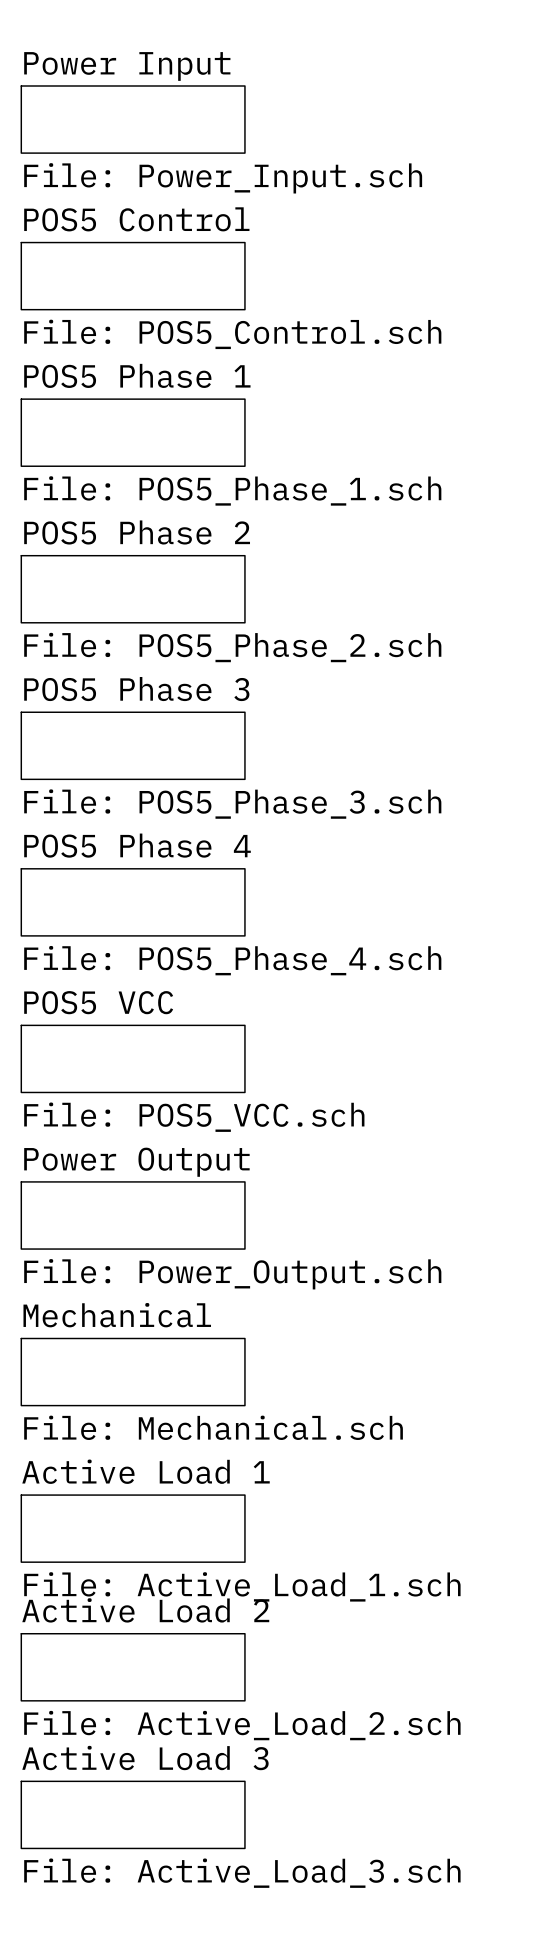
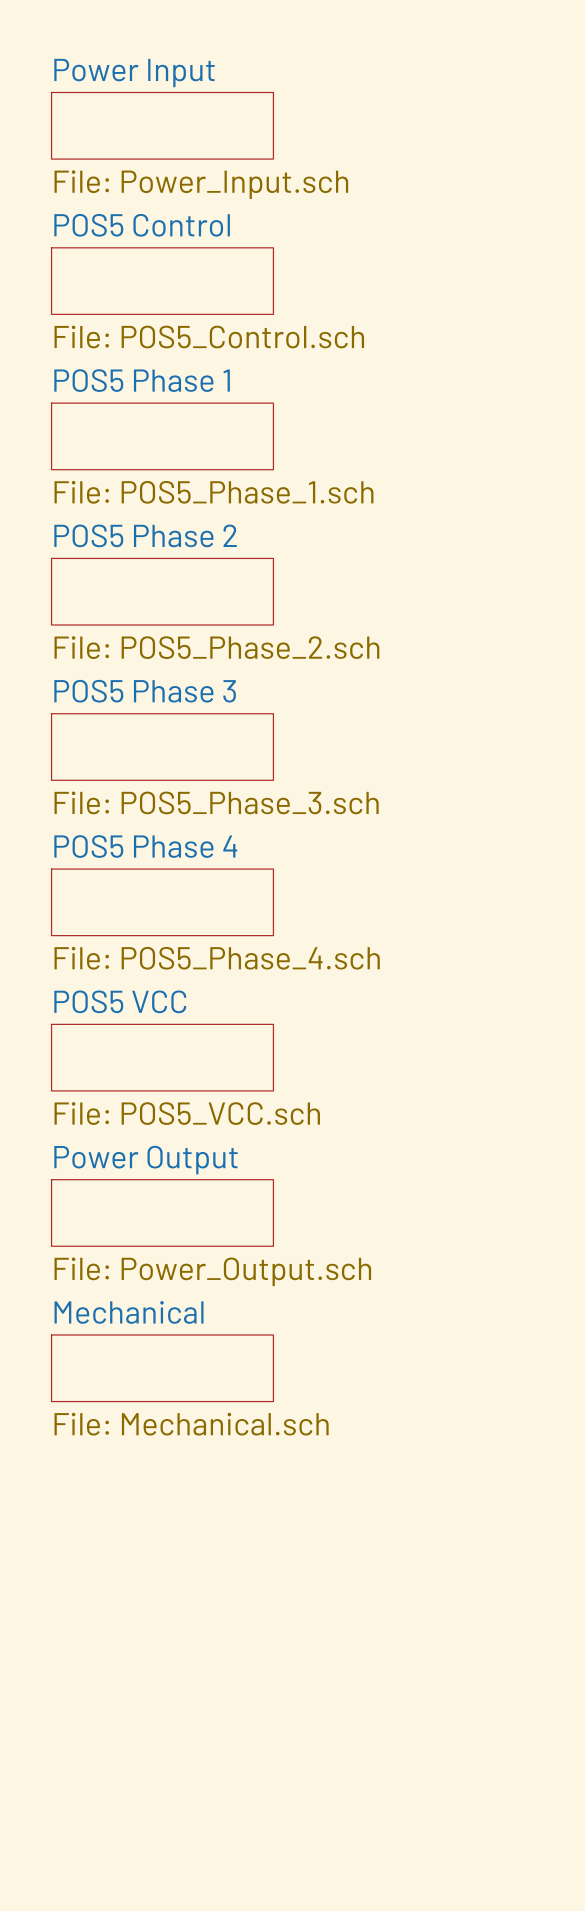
sheet Active Load 1: File: Active_Load_1.sch (133, 1528) -> none
sheet Active Load 2: File: Active_Load_2.sch (133, 1667) -> none
sheet Active Load 3: File: Active_Load_3.sch (133, 1814) -> none

